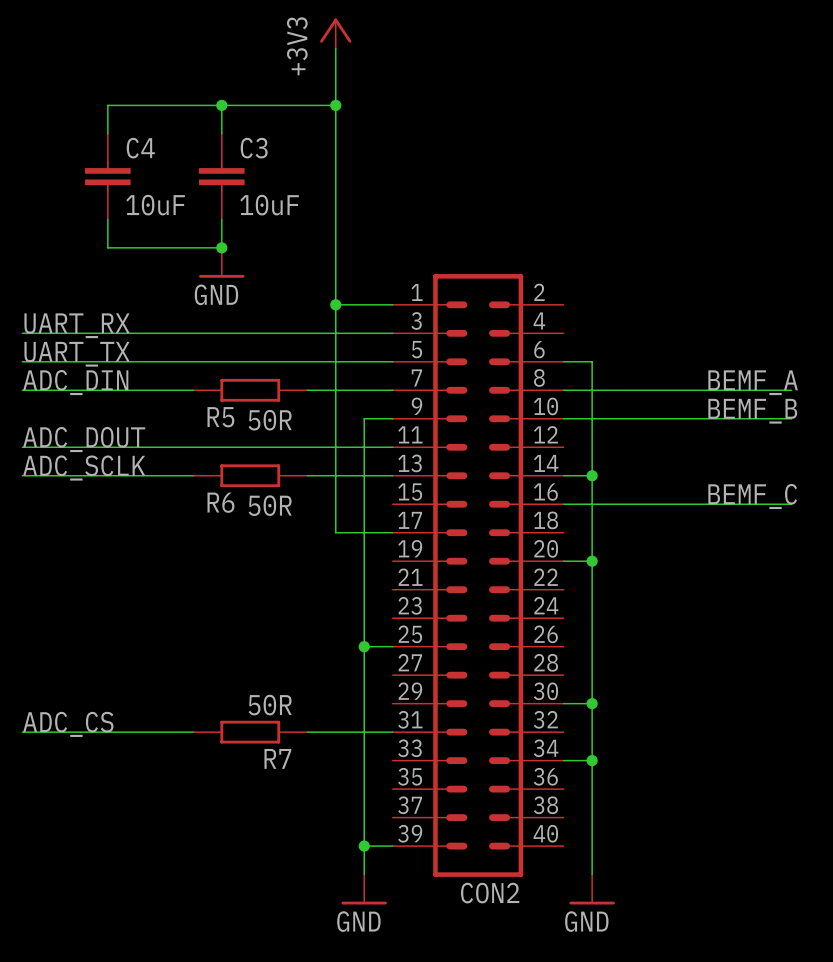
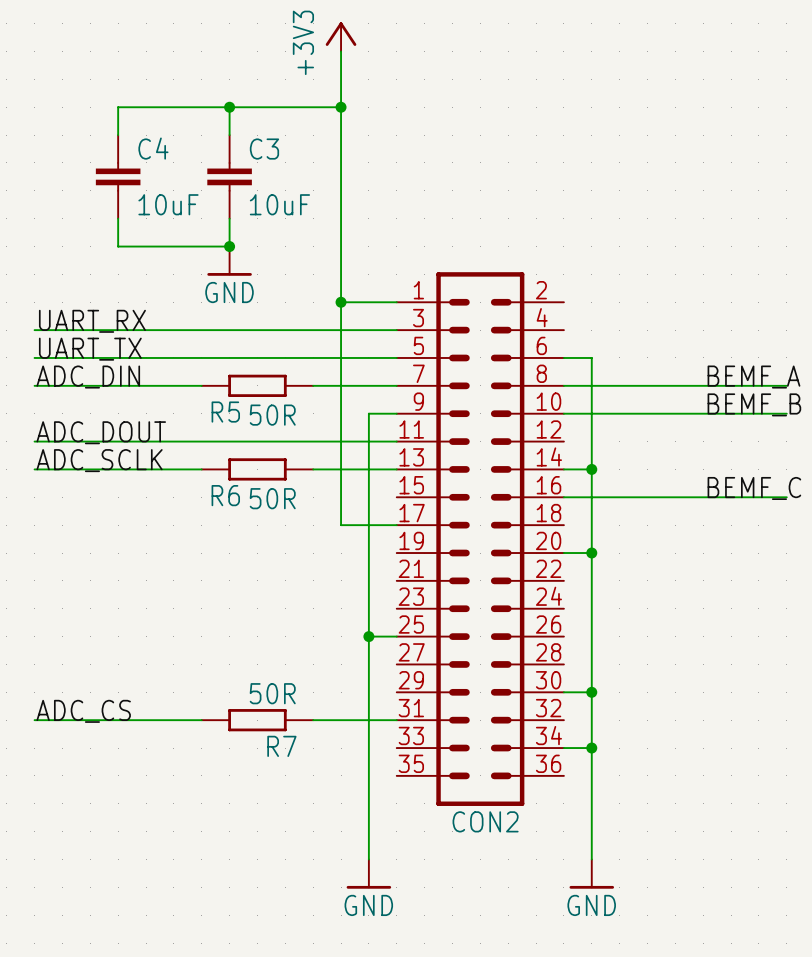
CON2 symbol: [392, 274, 564, 877] -> [396, 272, 564, 806]
wire: (364, 846) (392, 846) -> none
junction: (364, 846) -> none
CON2 name position: CON2 (490, 893) -> CON2 (485, 821)

